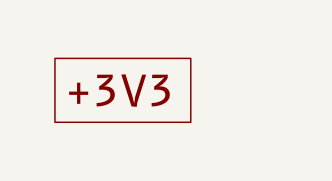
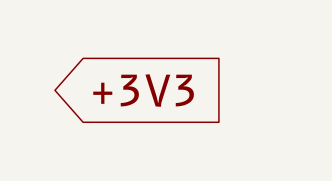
global label shape: passive (119, 90) -> input (143, 90)

